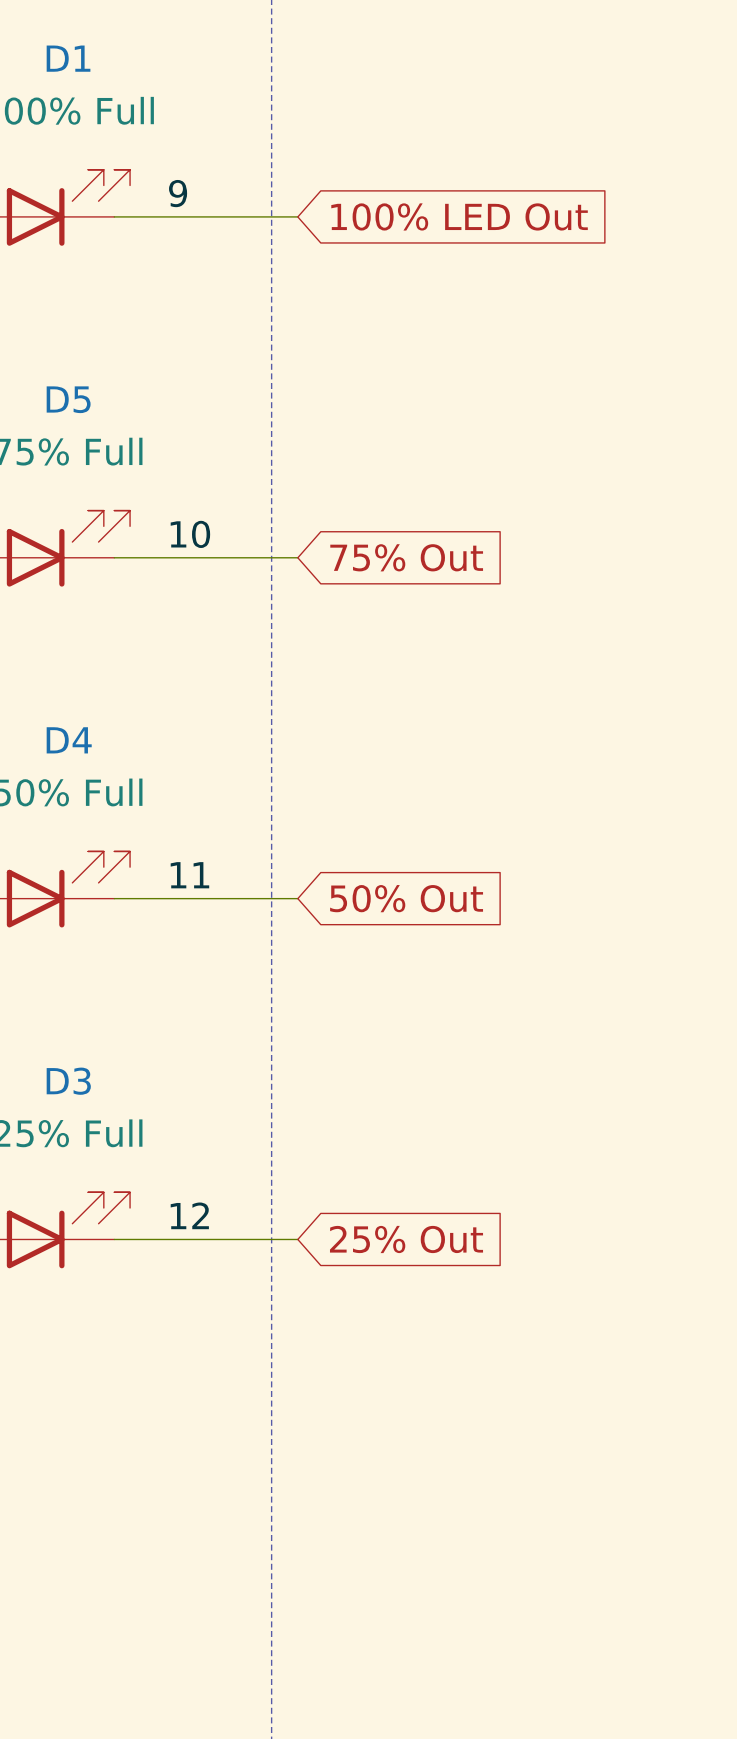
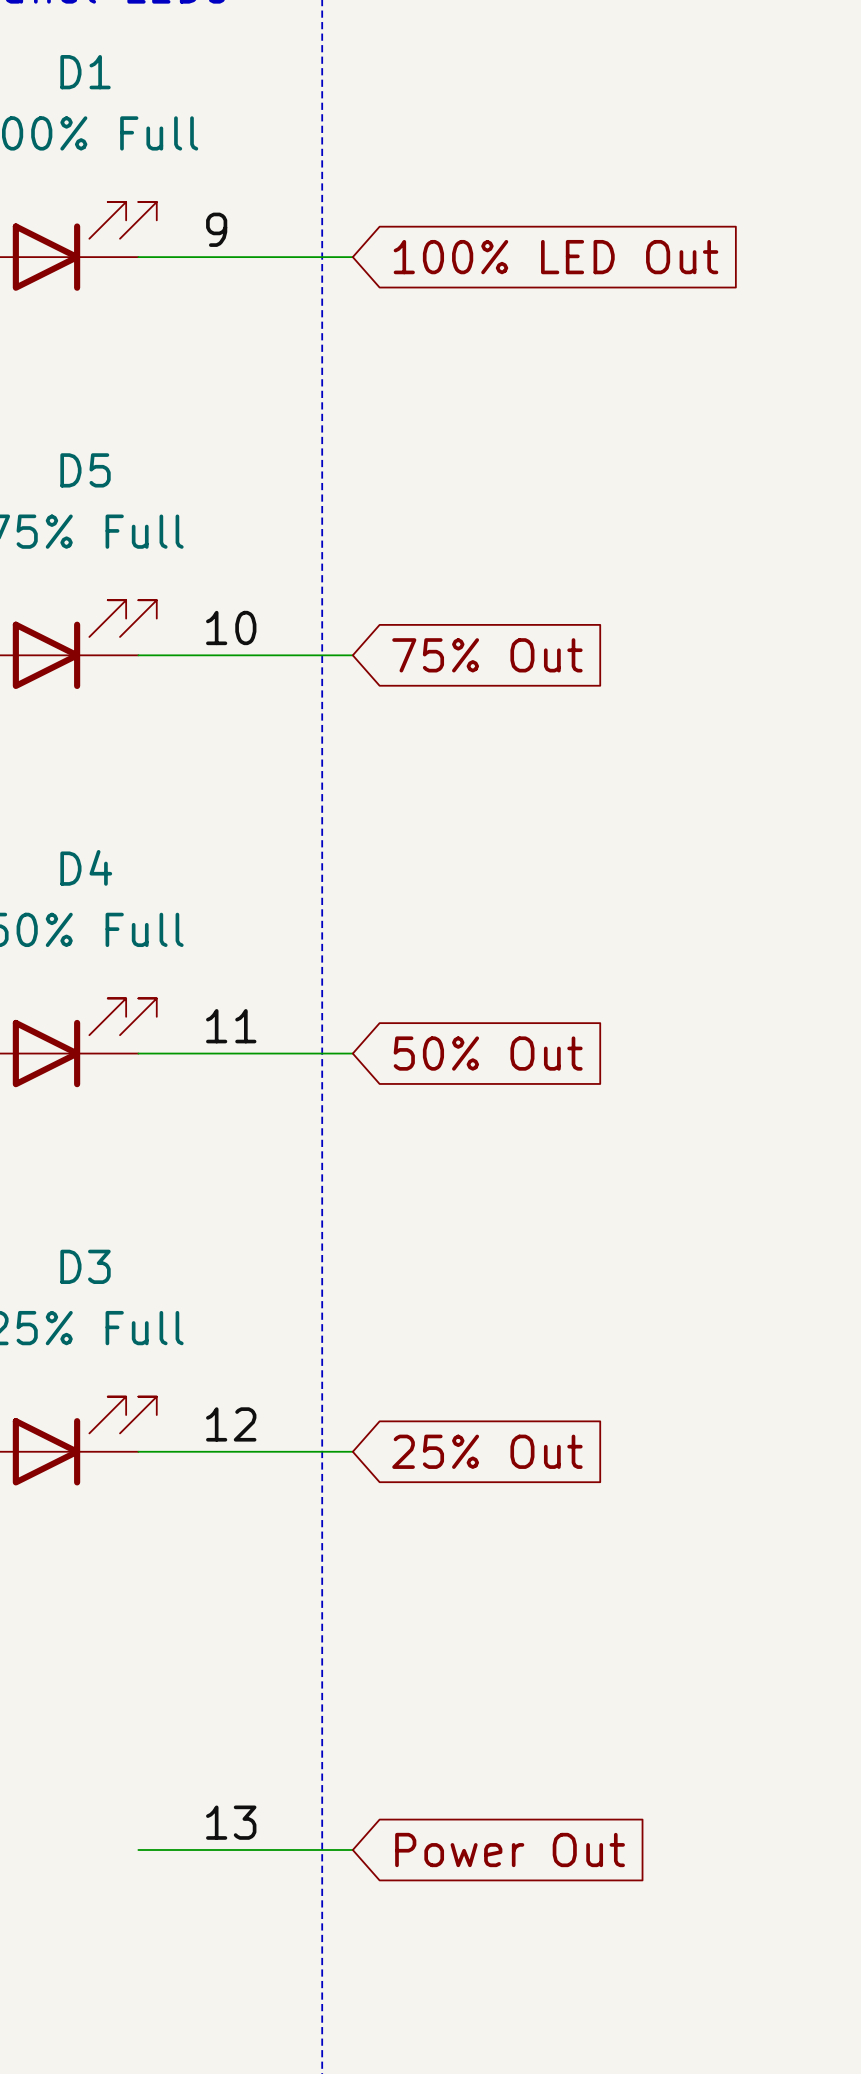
label: none -> 13 (231, 1822)
wire: none -> (138, 1849) (352, 1849)
global label: none -> Power Out (510, 1849)

